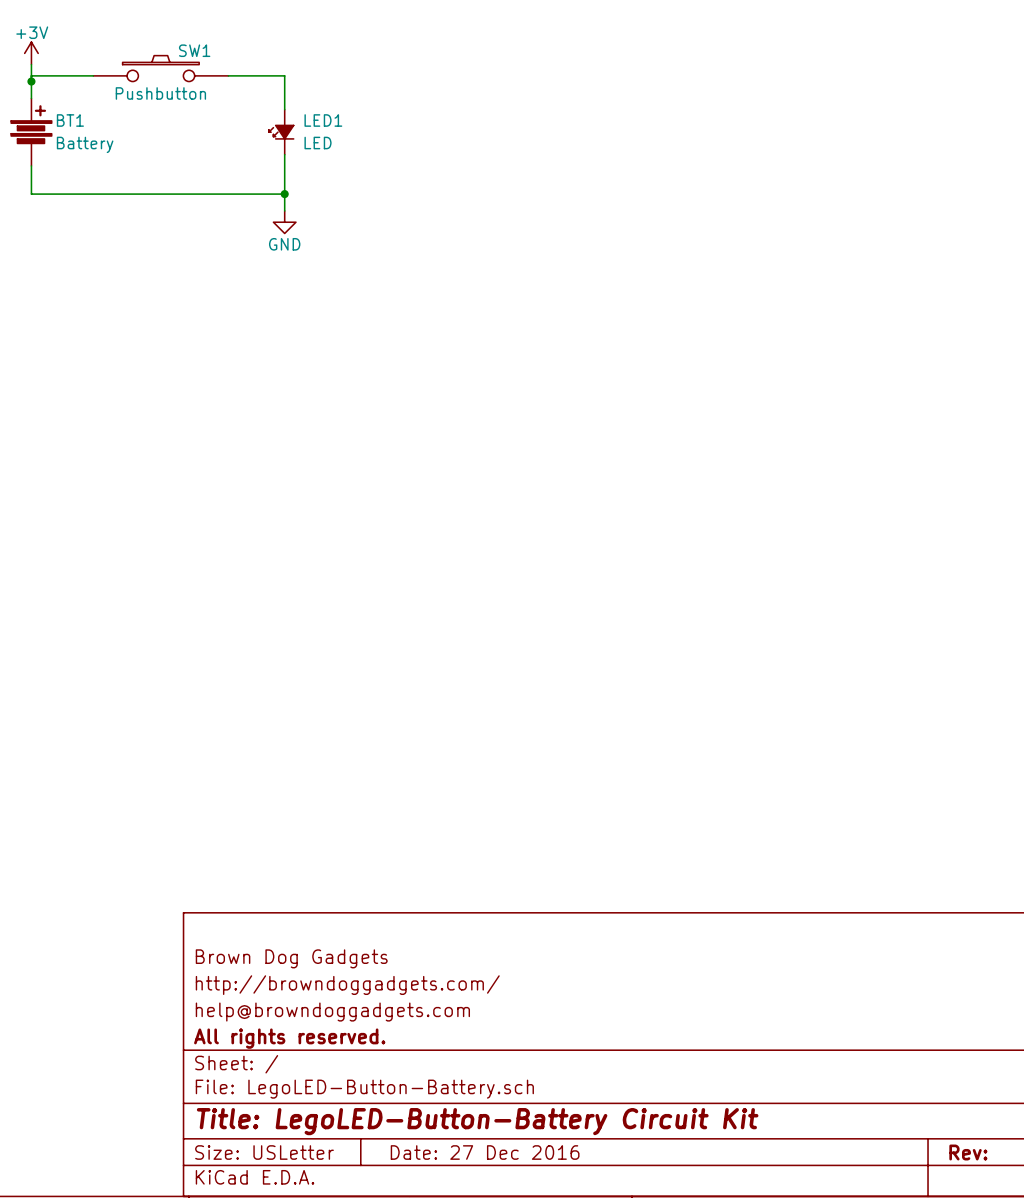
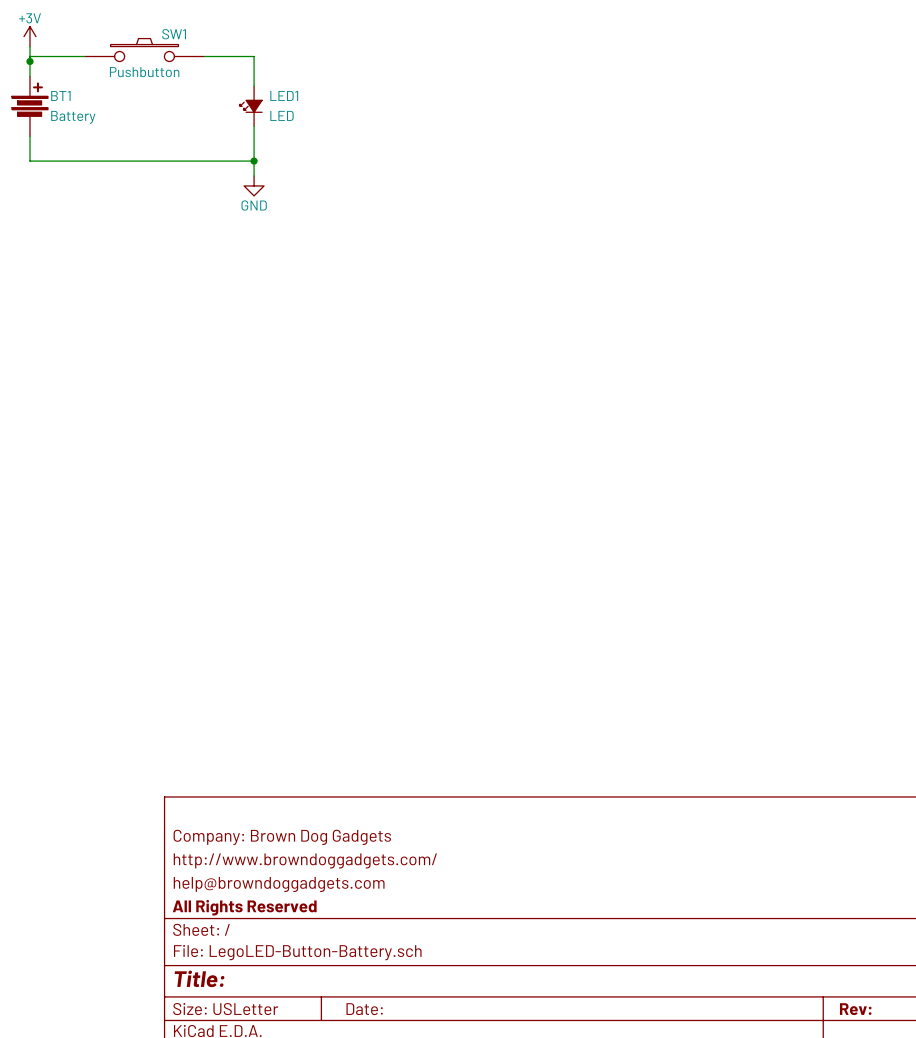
title block: Brown Dog Gadgets (291, 958) -> Company: Brown Dog Gadgets (282, 837)
title block: http://browndoggadgets.com/ (347, 985) -> http://www.browndoggadgets.com/ (305, 860)
title block: All rights reserved. (289, 1038) -> All Rights Reserved (244, 907)
title block: Title: LegoLED-Button-Battery Circuit Kit (477, 1121) -> Title: (199, 978)
title block: Date: 27 Dec 2016 (485, 1152) -> Date: (364, 1009)

